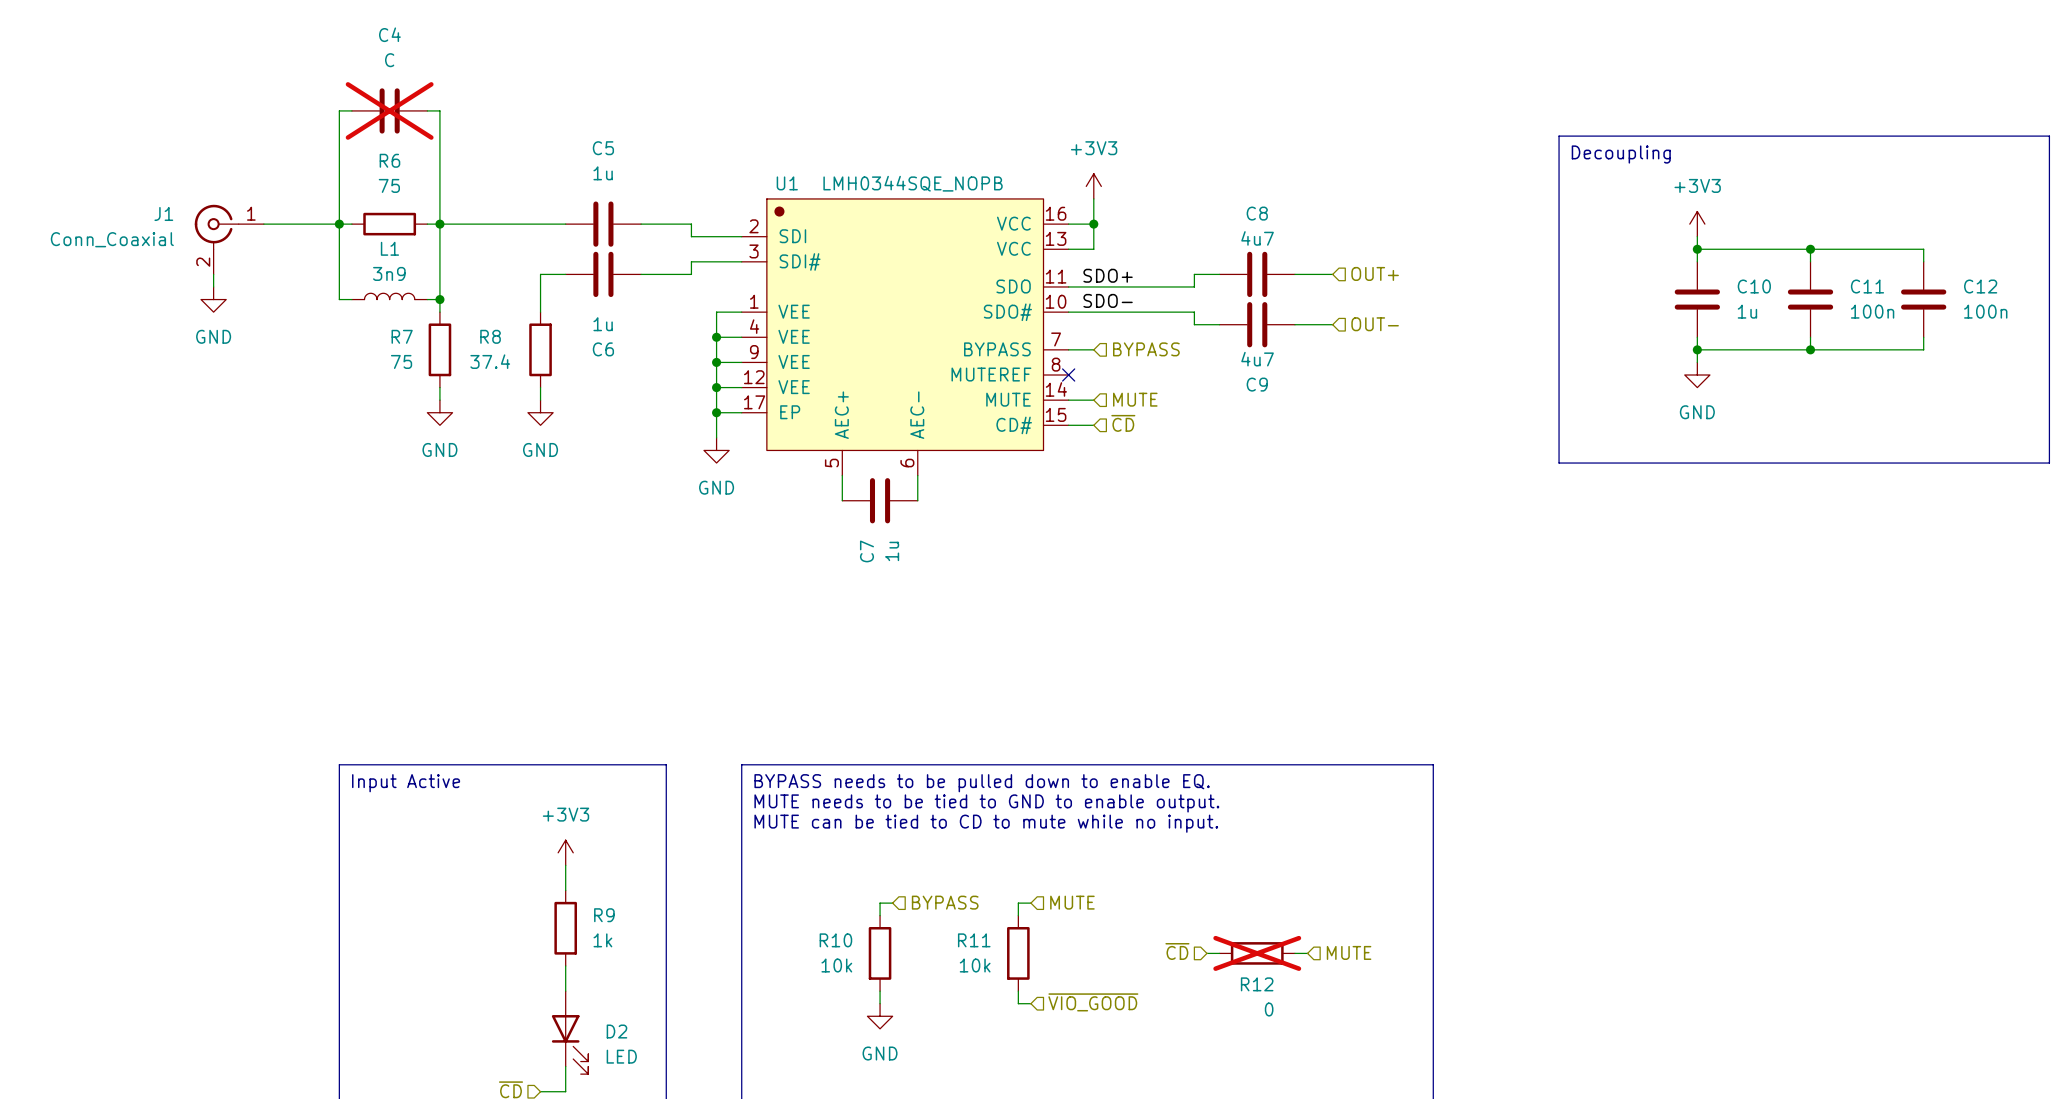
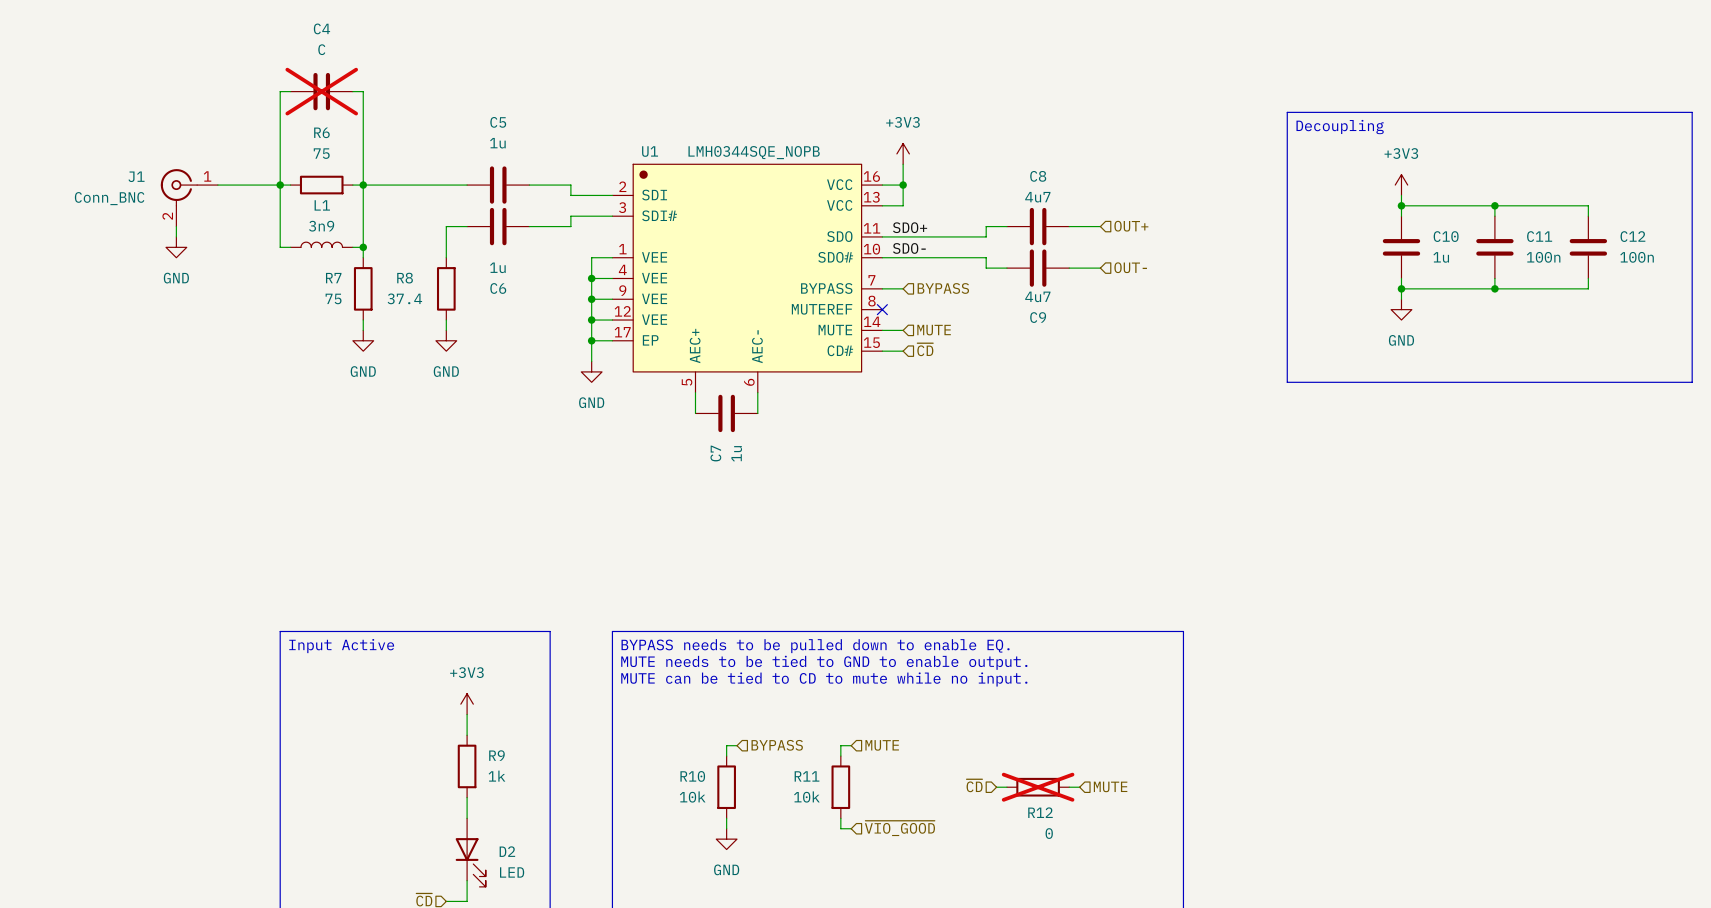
J1 value: Conn_Coaxial (112, 239) -> Conn_BNC (109, 198)

